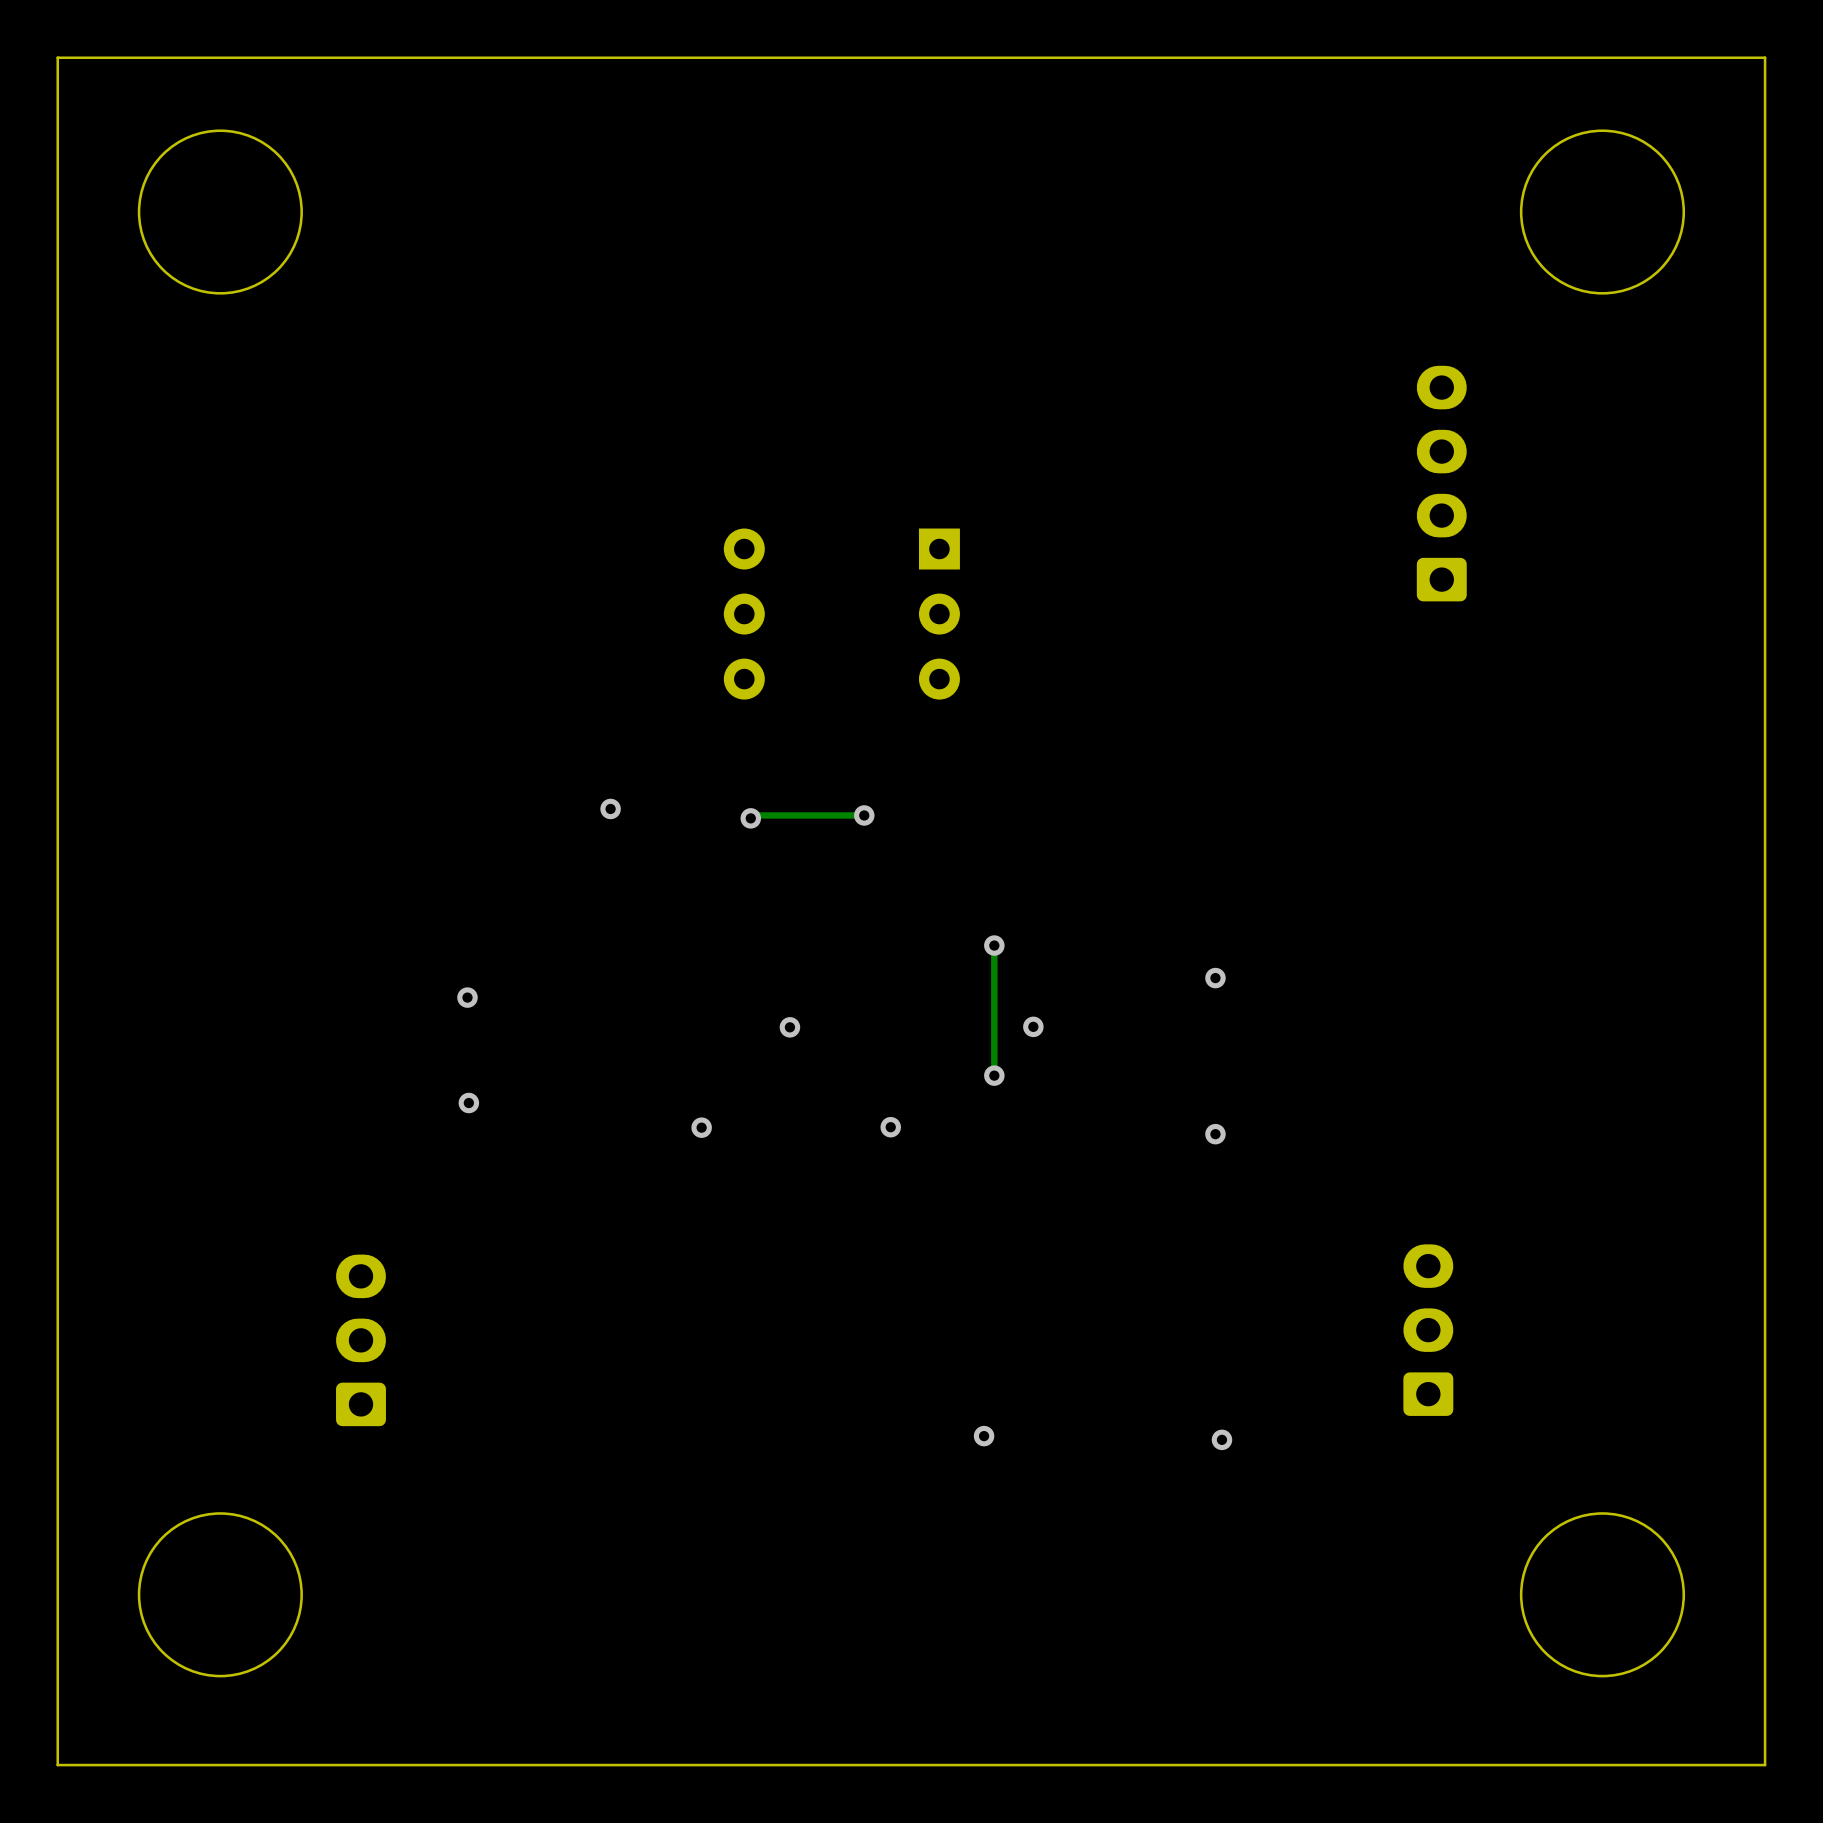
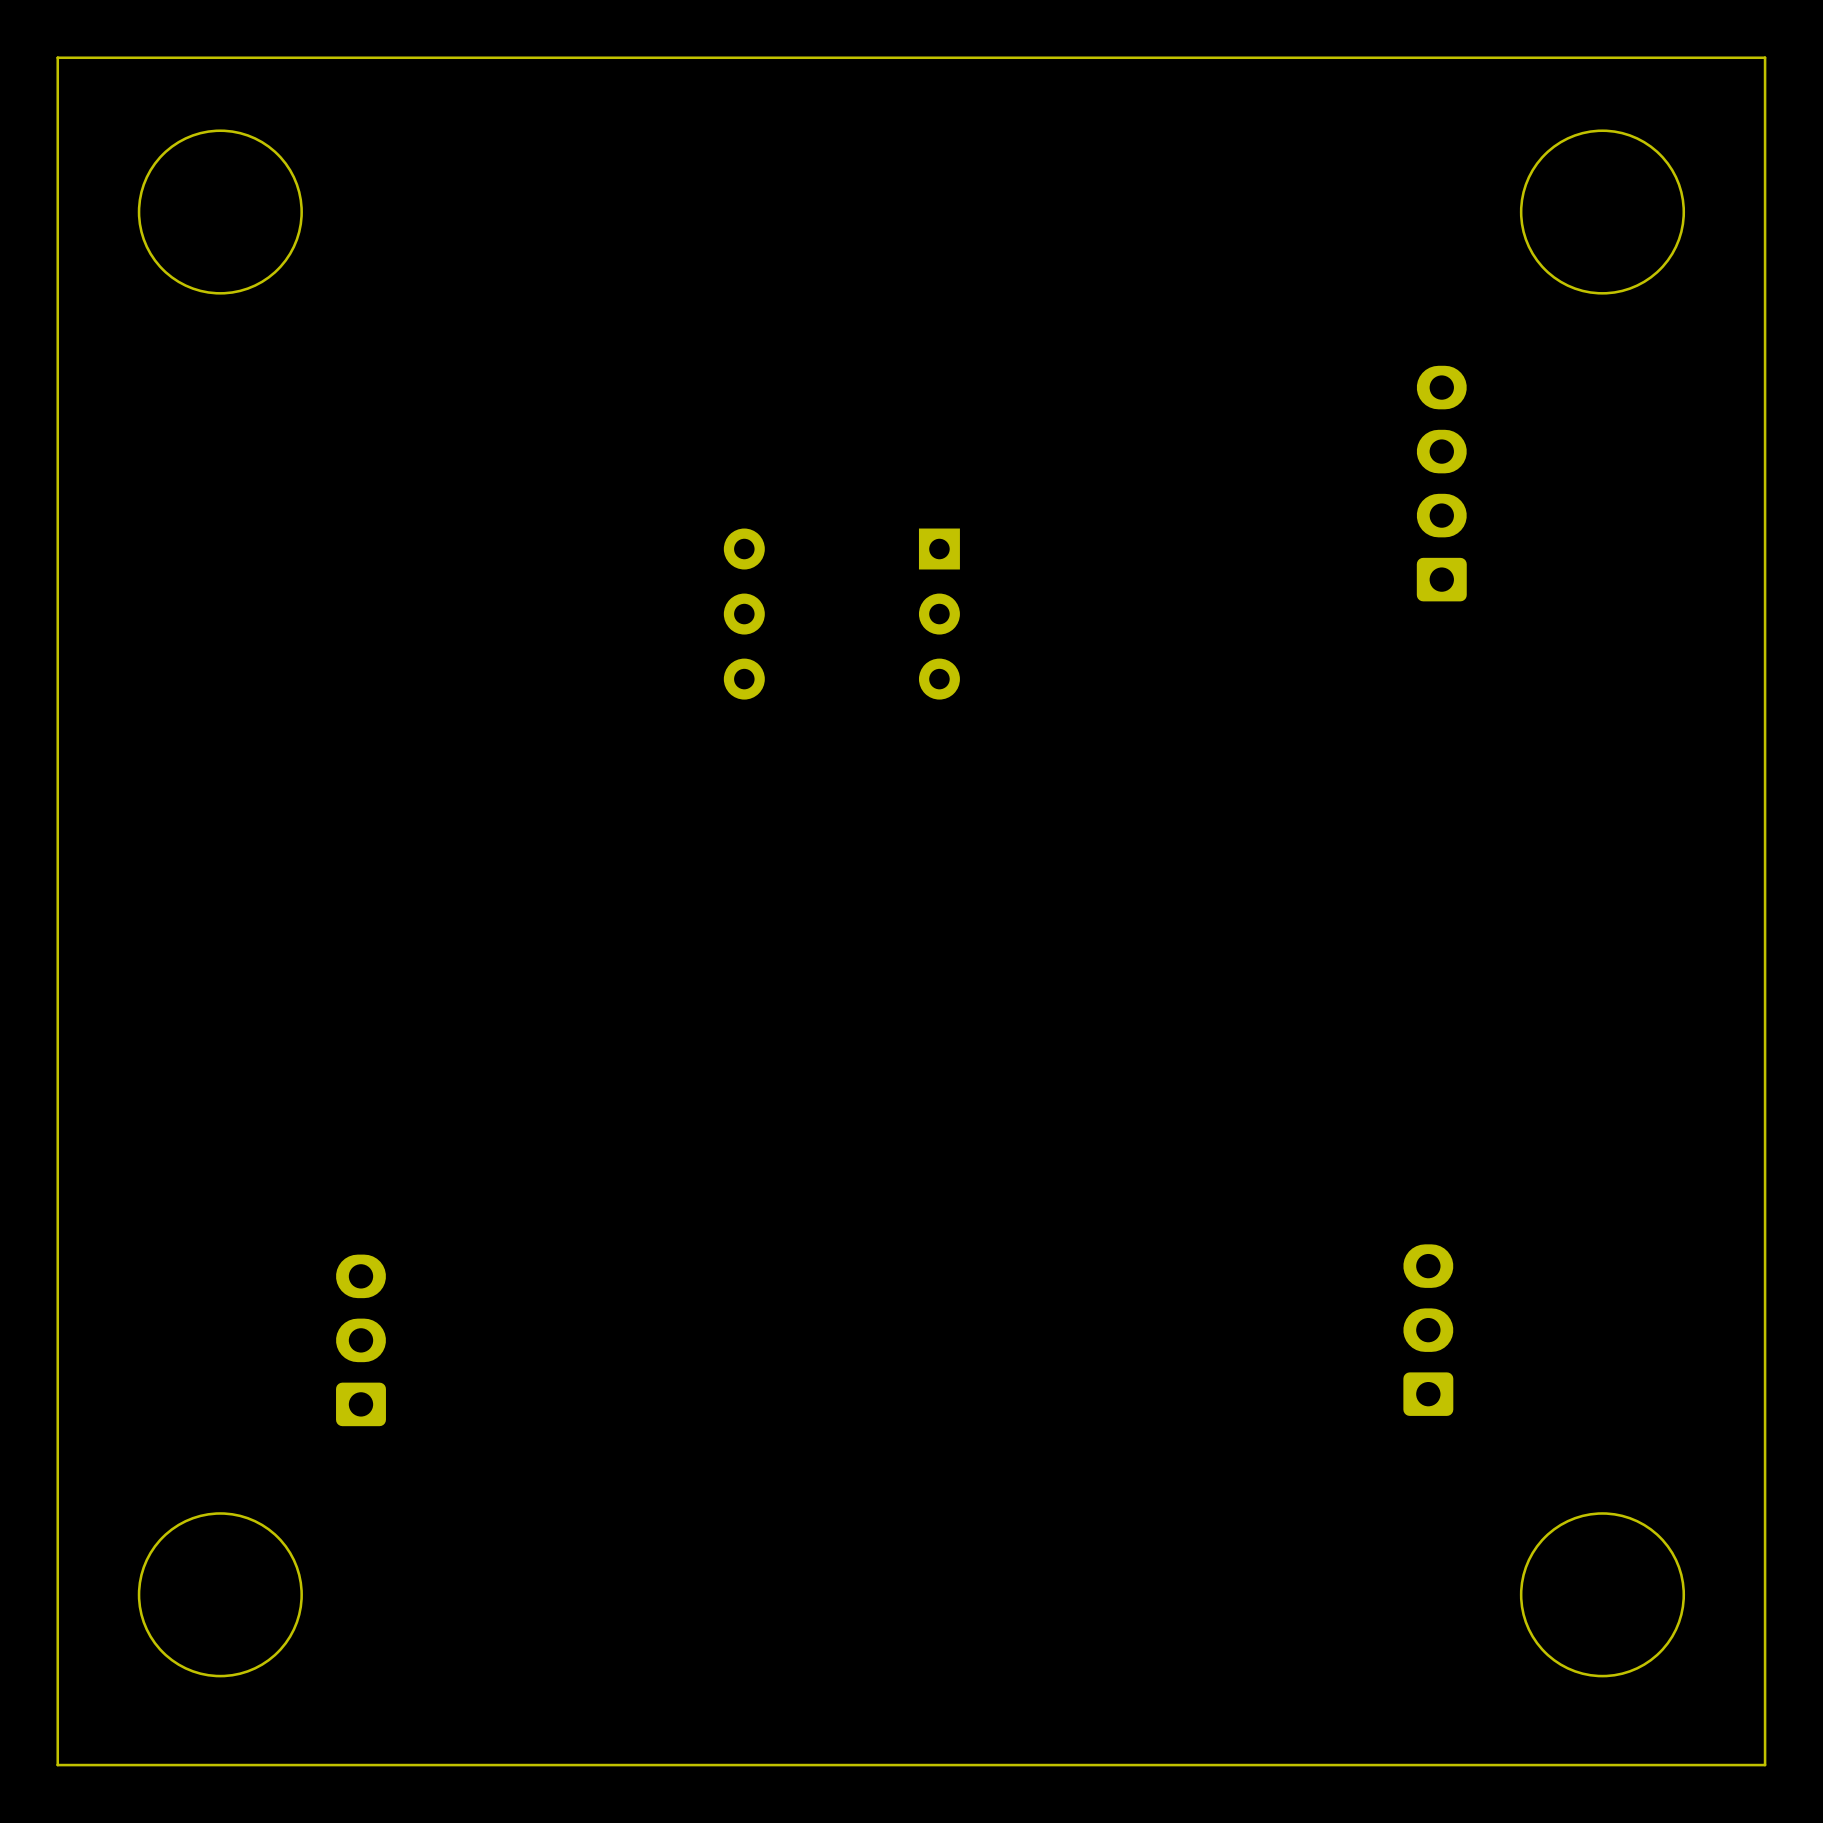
via: (610, 808) -> none
track: (864, 815) (753, 815) (750, 818) -> none
via: (864, 815) -> none
via: (750, 818) -> none
track: (994, 945) (994, 1075) -> none
via: (994, 945) -> none
via: (1215, 978) -> none
via: (467, 997) -> none
via: (1033, 1026) -> none
via: (789, 1027) -> none
via: (994, 1075) -> none
via: (468, 1103) -> none
via: (701, 1127) -> none
via: (890, 1127) -> none
via: (1215, 1134) -> none
via: (984, 1436) -> none
via: (1221, 1439) -> none

